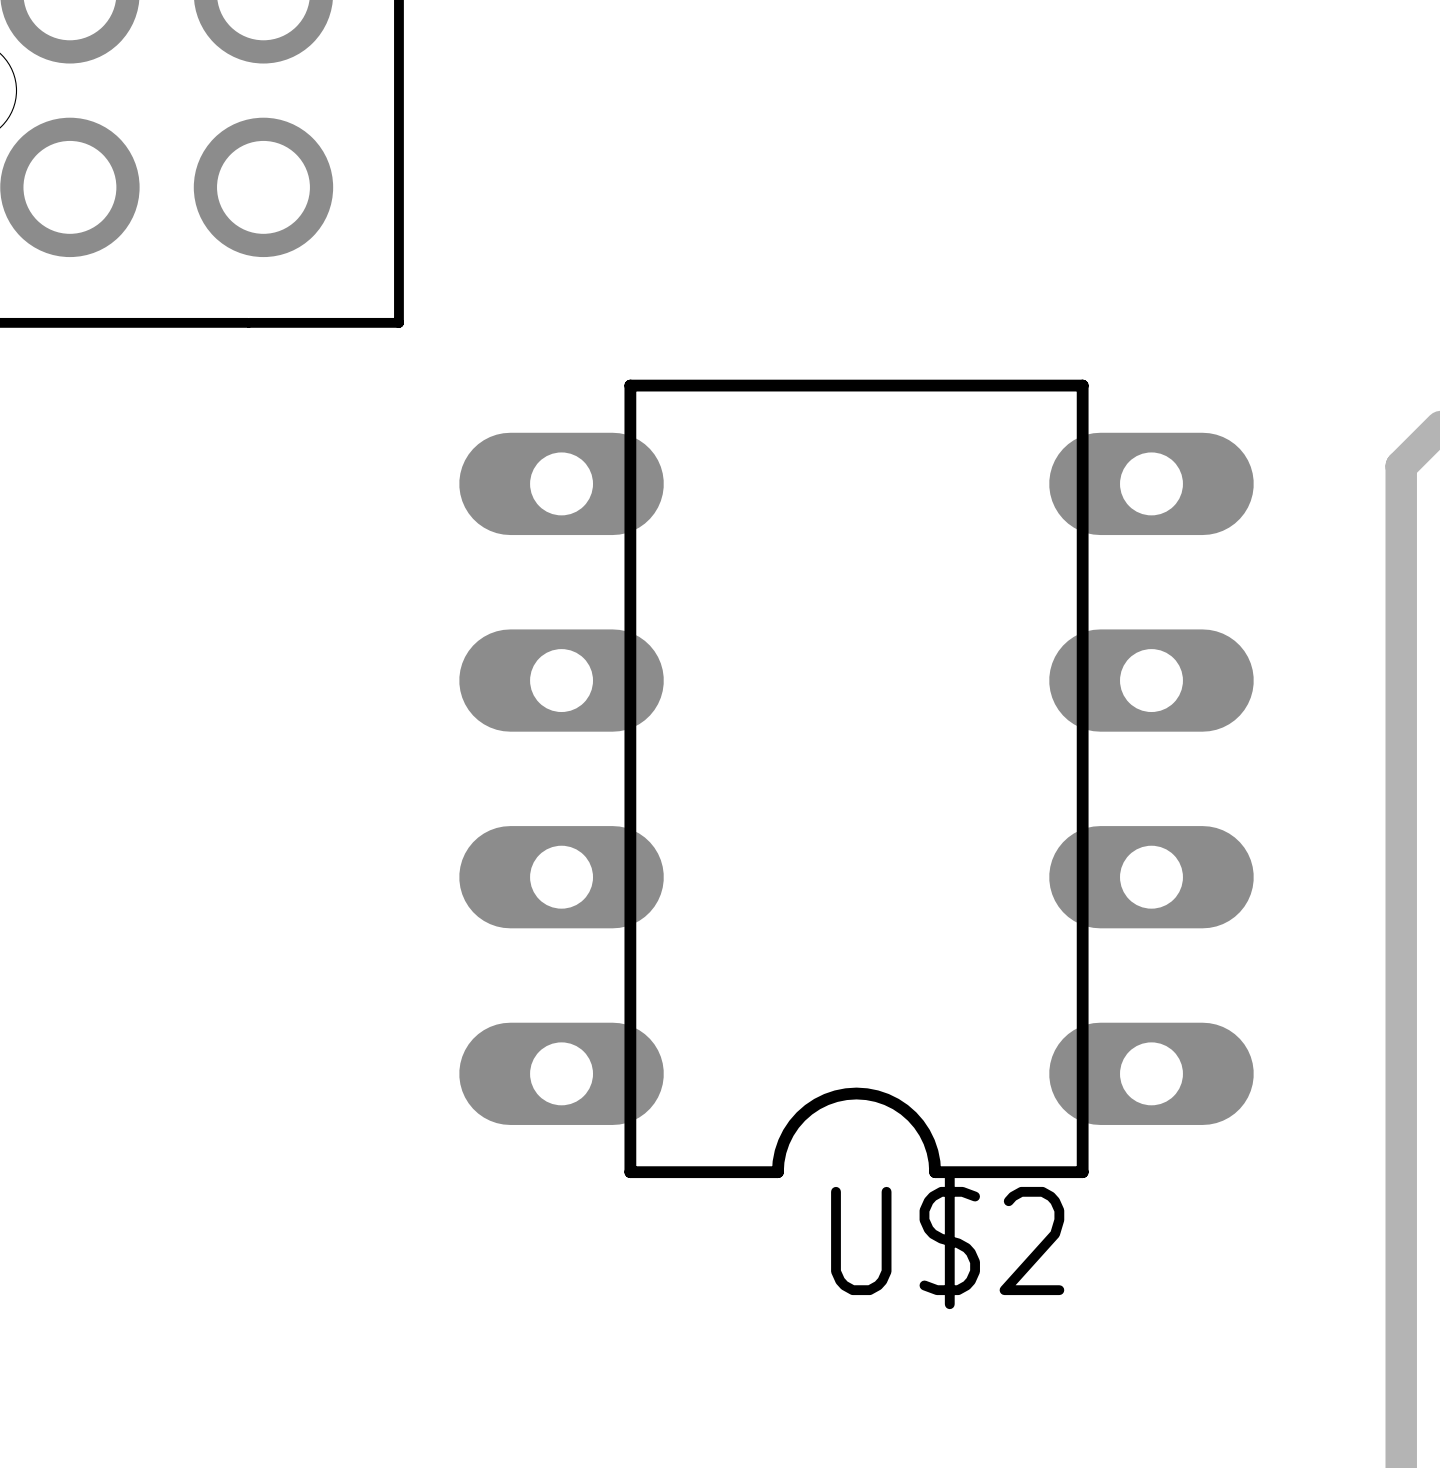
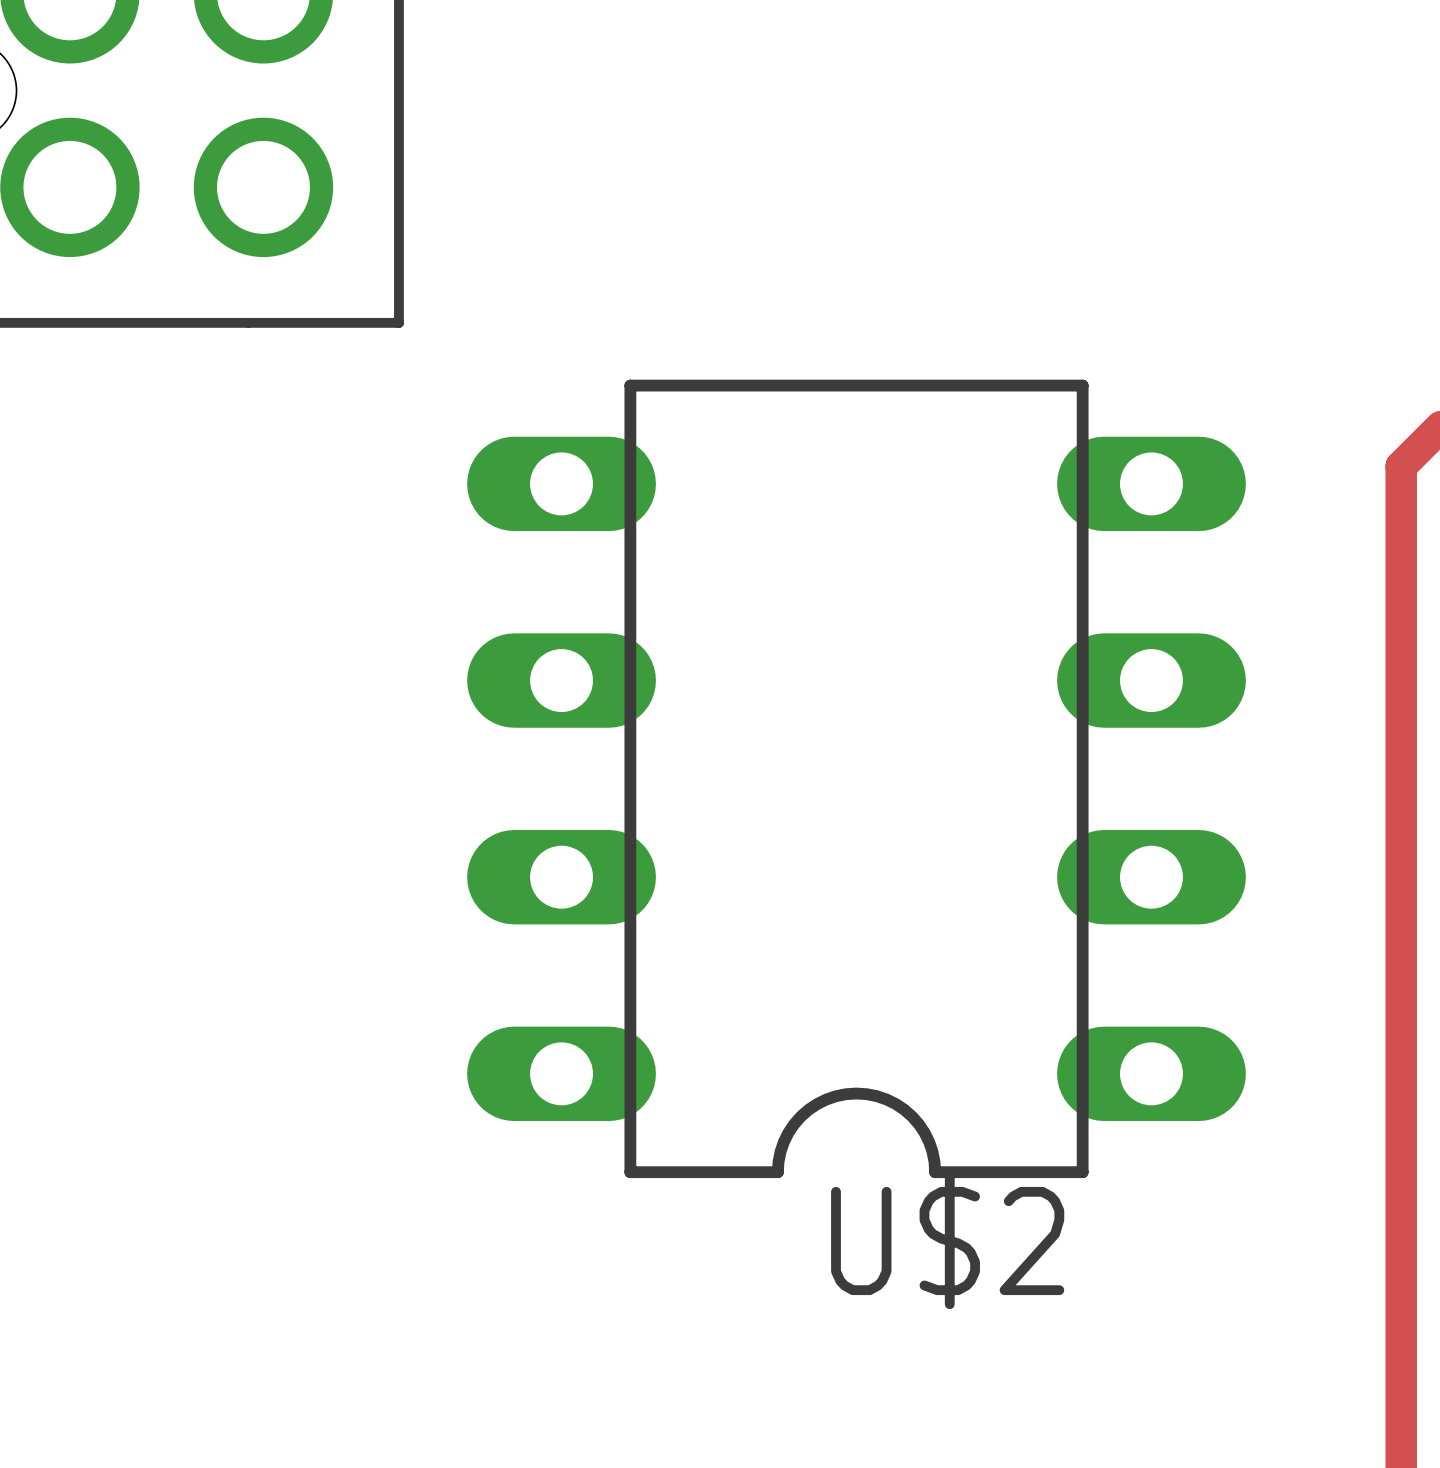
U$2 footprint: [459, 379, 1254, 1179] -> [467, 379, 1246, 1179]

